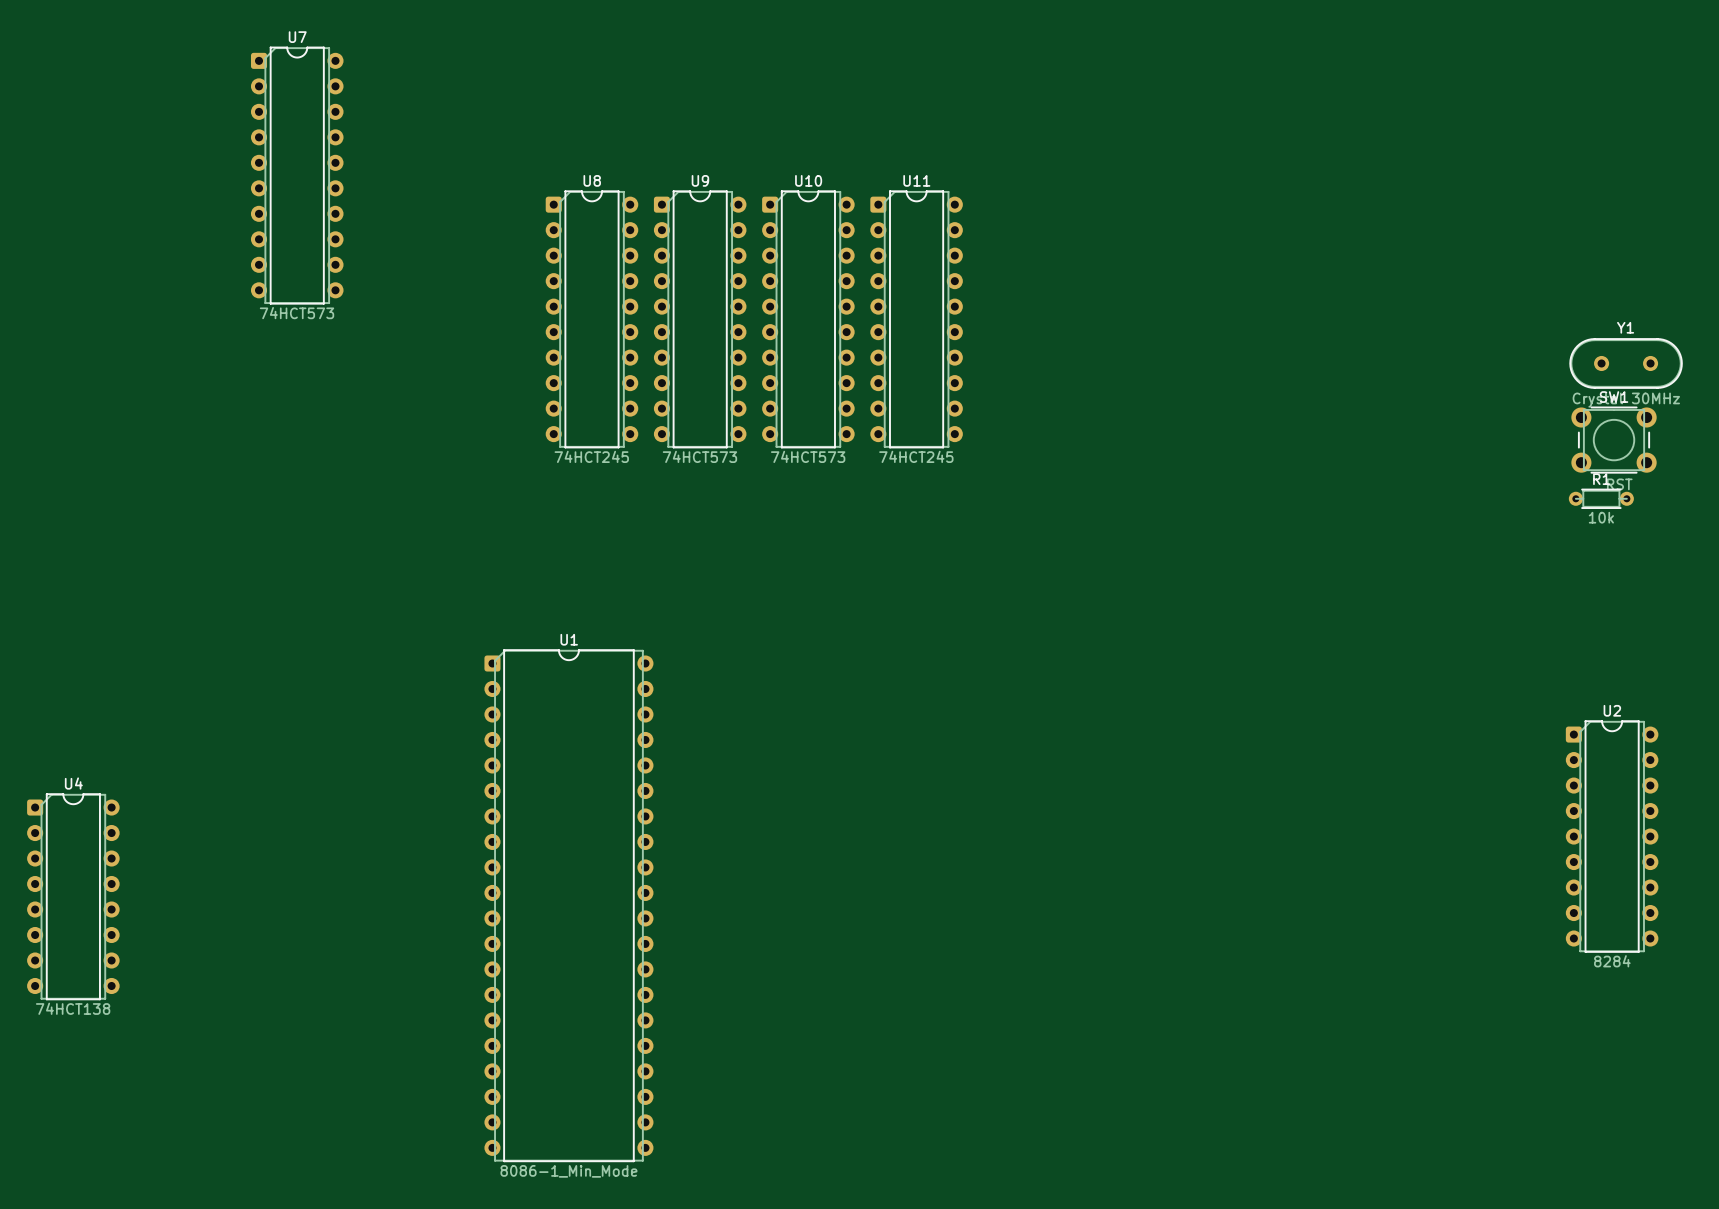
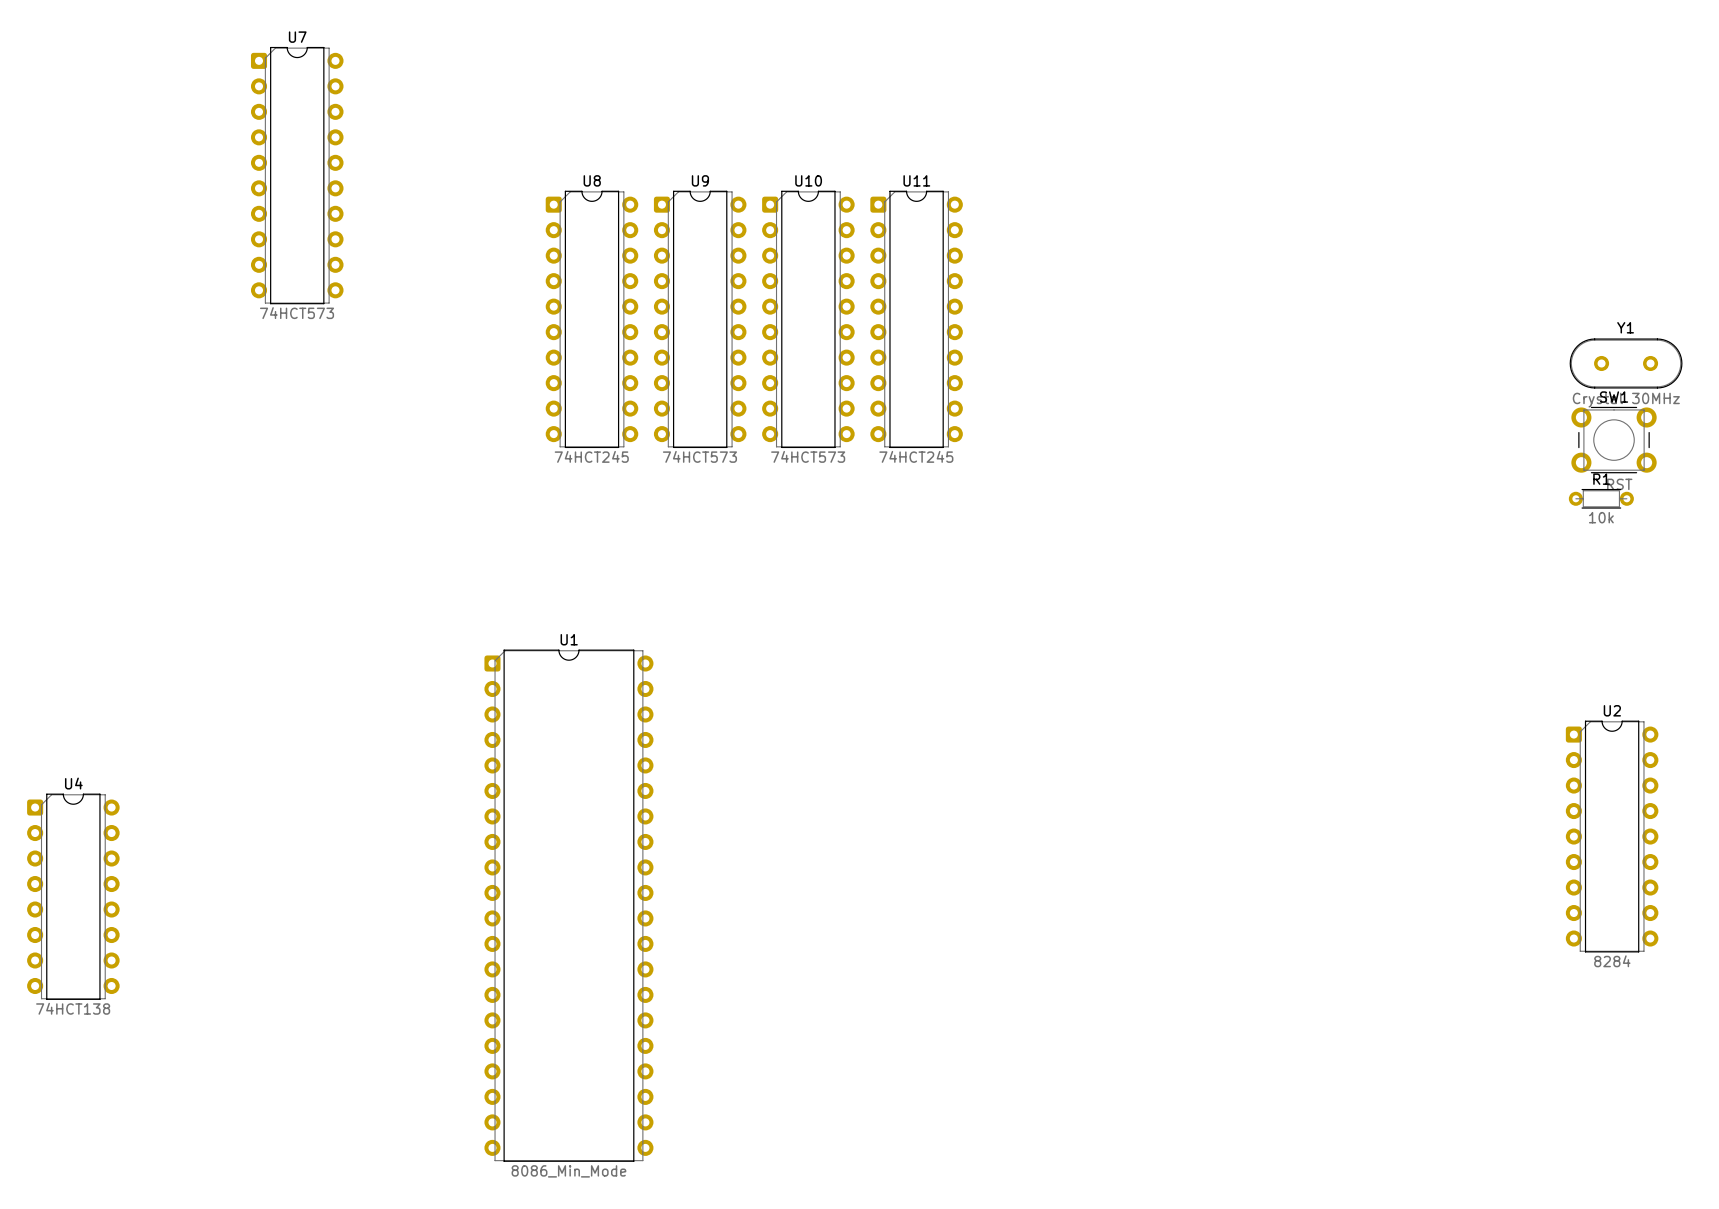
U1 value: 8086-1_Min_Mode (568, 1171) -> 8086_Min_Mode (568, 1171)

